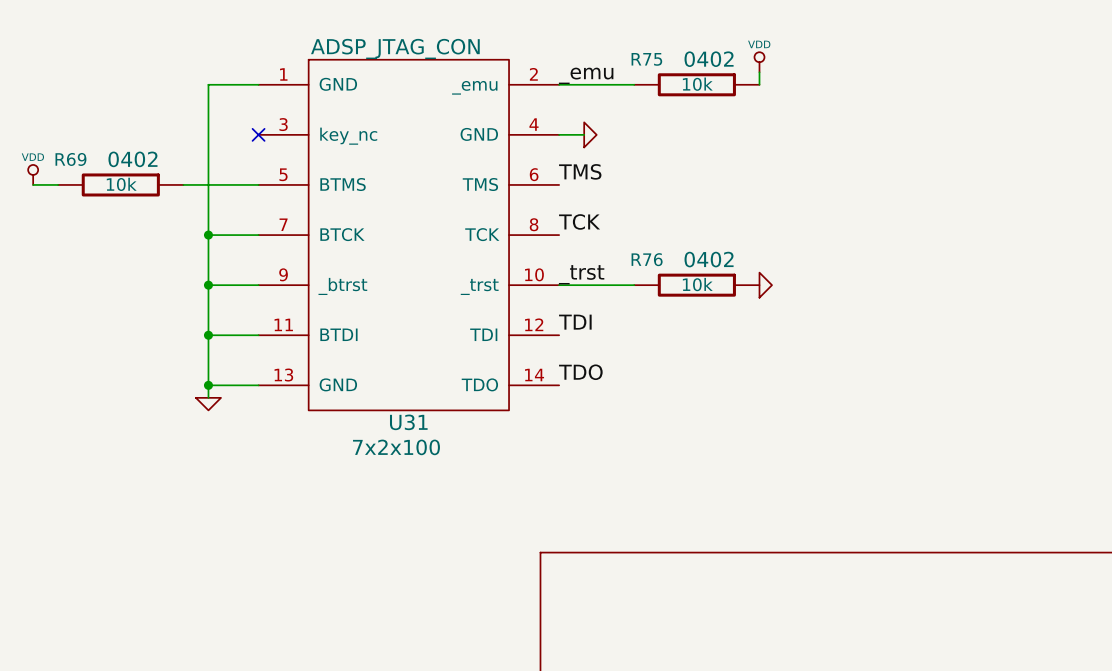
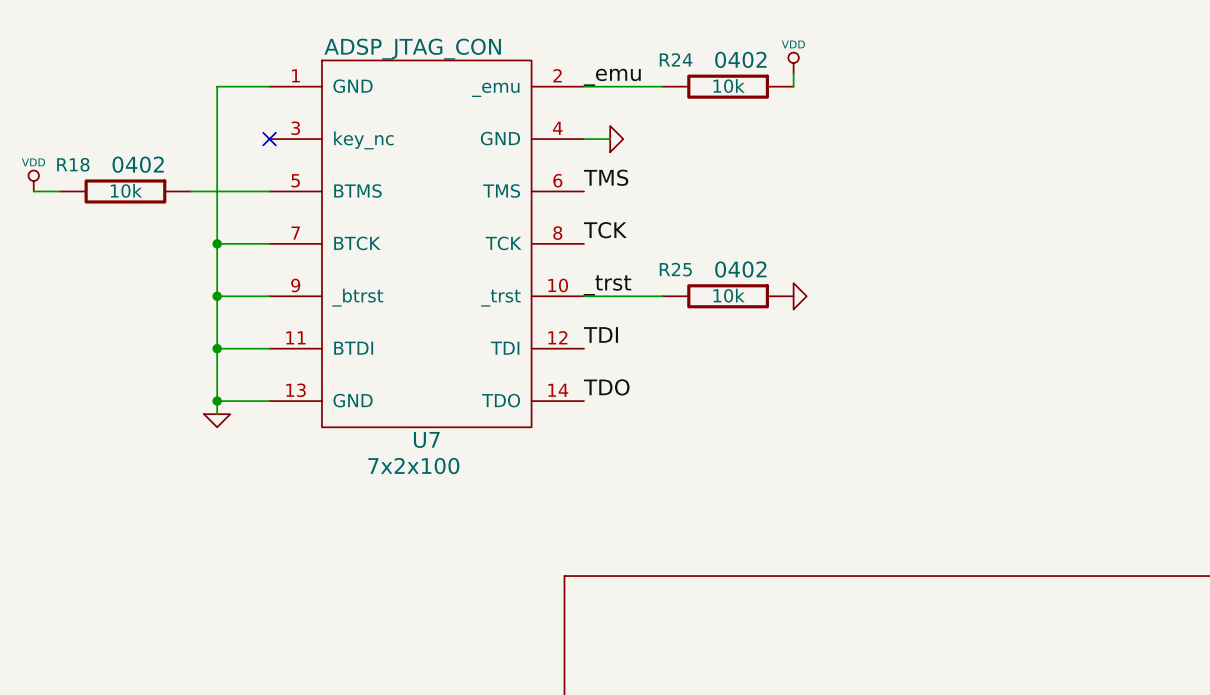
R75 name: R75 (646, 59) -> R24 (676, 59)
R69 name: R69 (70, 159) -> R18 (73, 164)
R76 name: R76 (647, 259) -> R25 (675, 269)
U31 name: U31 (408, 422) -> U7 (426, 439)

